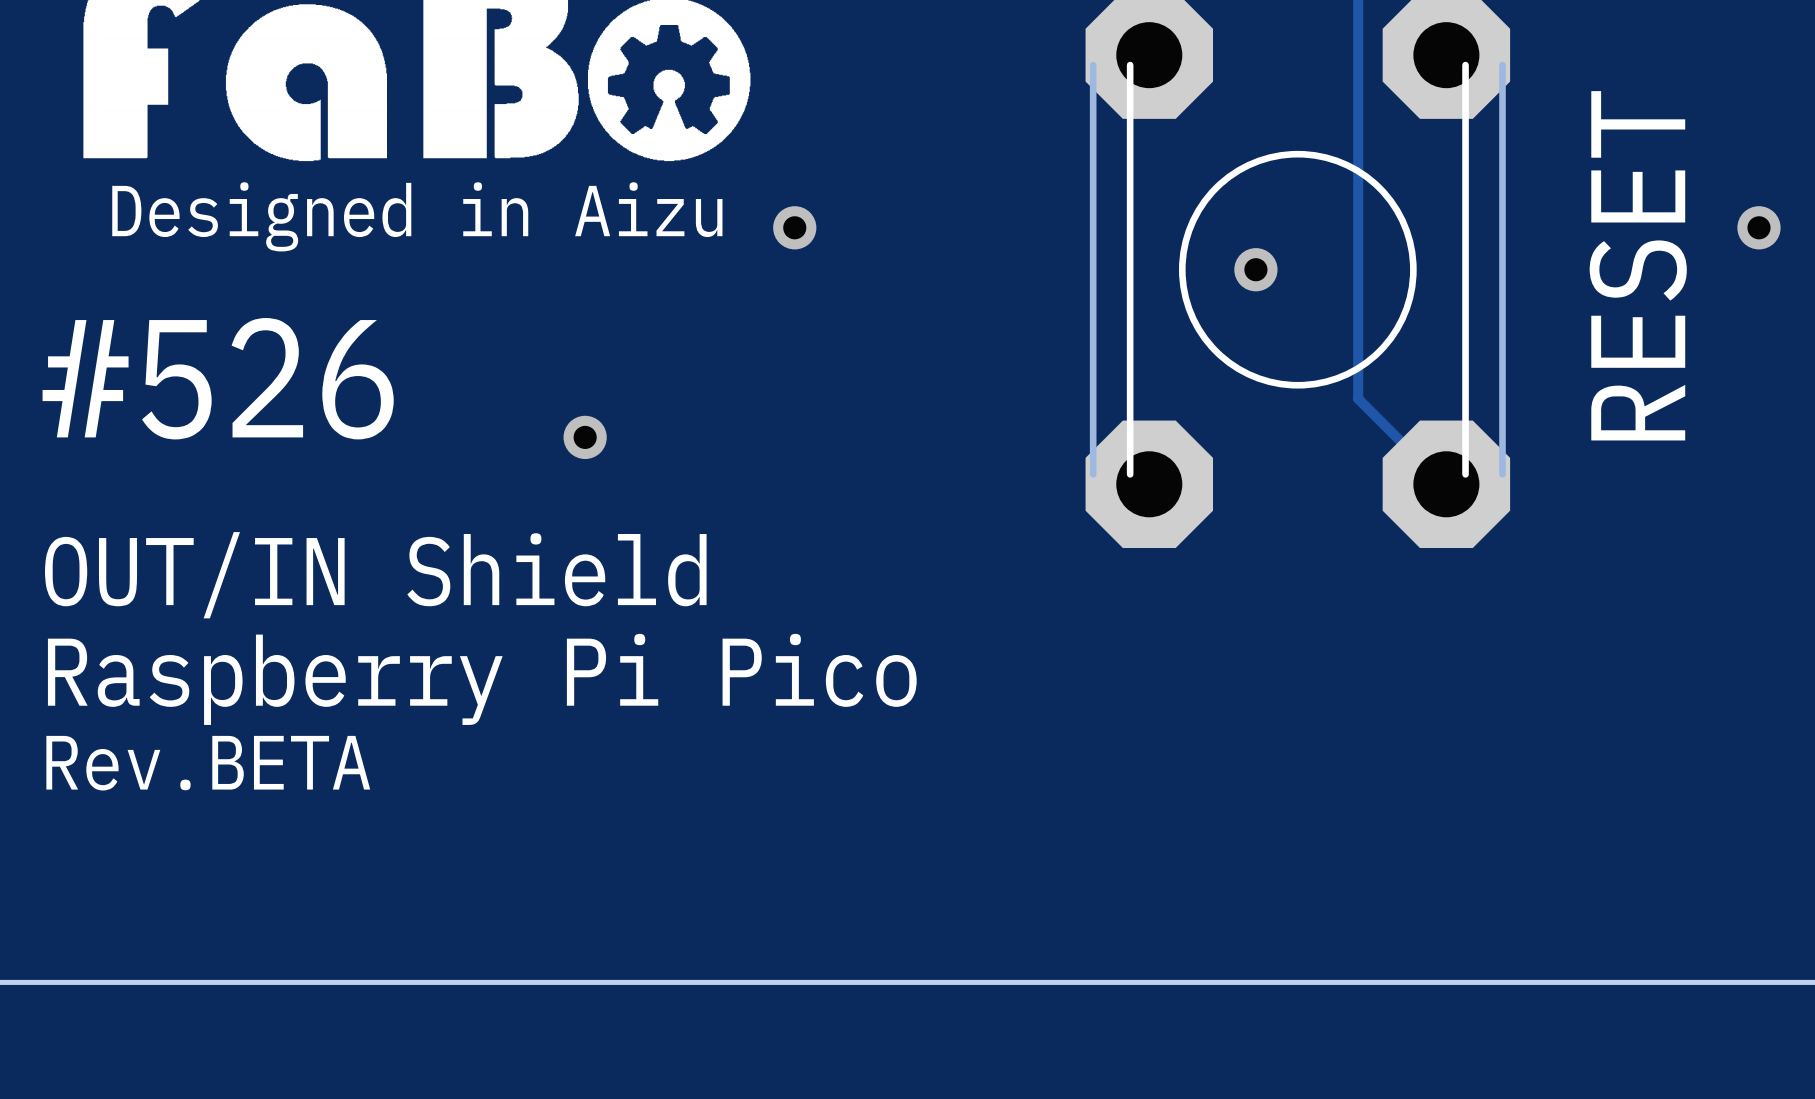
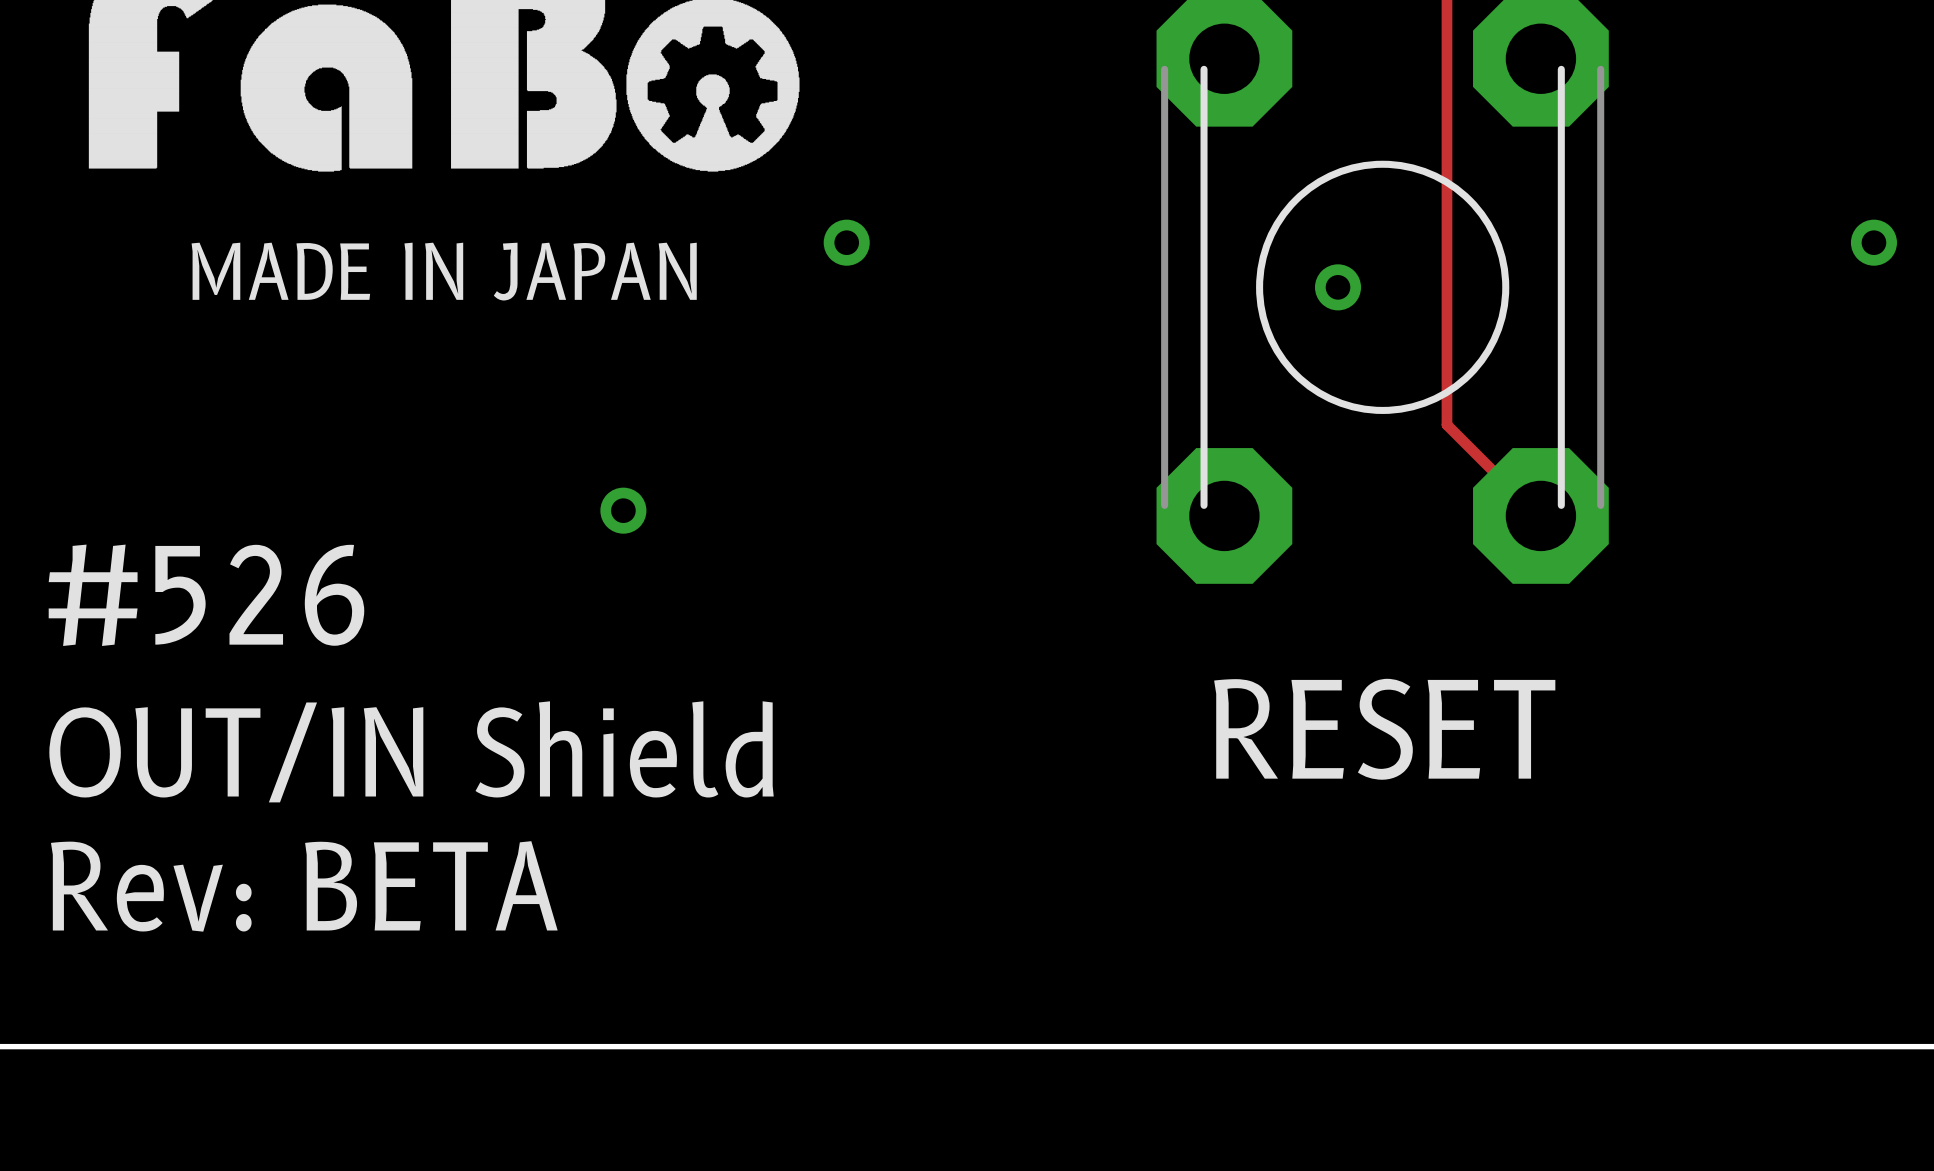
text: Designed in Aizu (417, 216) -> MADE IN JAPAN (444, 271)
text rotation: 0° (1638, 265) -> 90° clockwise (1384, 729)
text position: RESET (1638, 265) -> RESET (1384, 729)
text: #526 (218, 378) -> none
via position: (585, 437) -> (623, 510)
text: OUT/IN Shield (375, 575) -> #526 (206, 595)
text: Raspberry Pi Pico (482, 679) -> none
text: none -> OUT/IN Shield (411, 751)
text: Rev.BETA (208, 763) -> Rev: BETA (304, 886)

